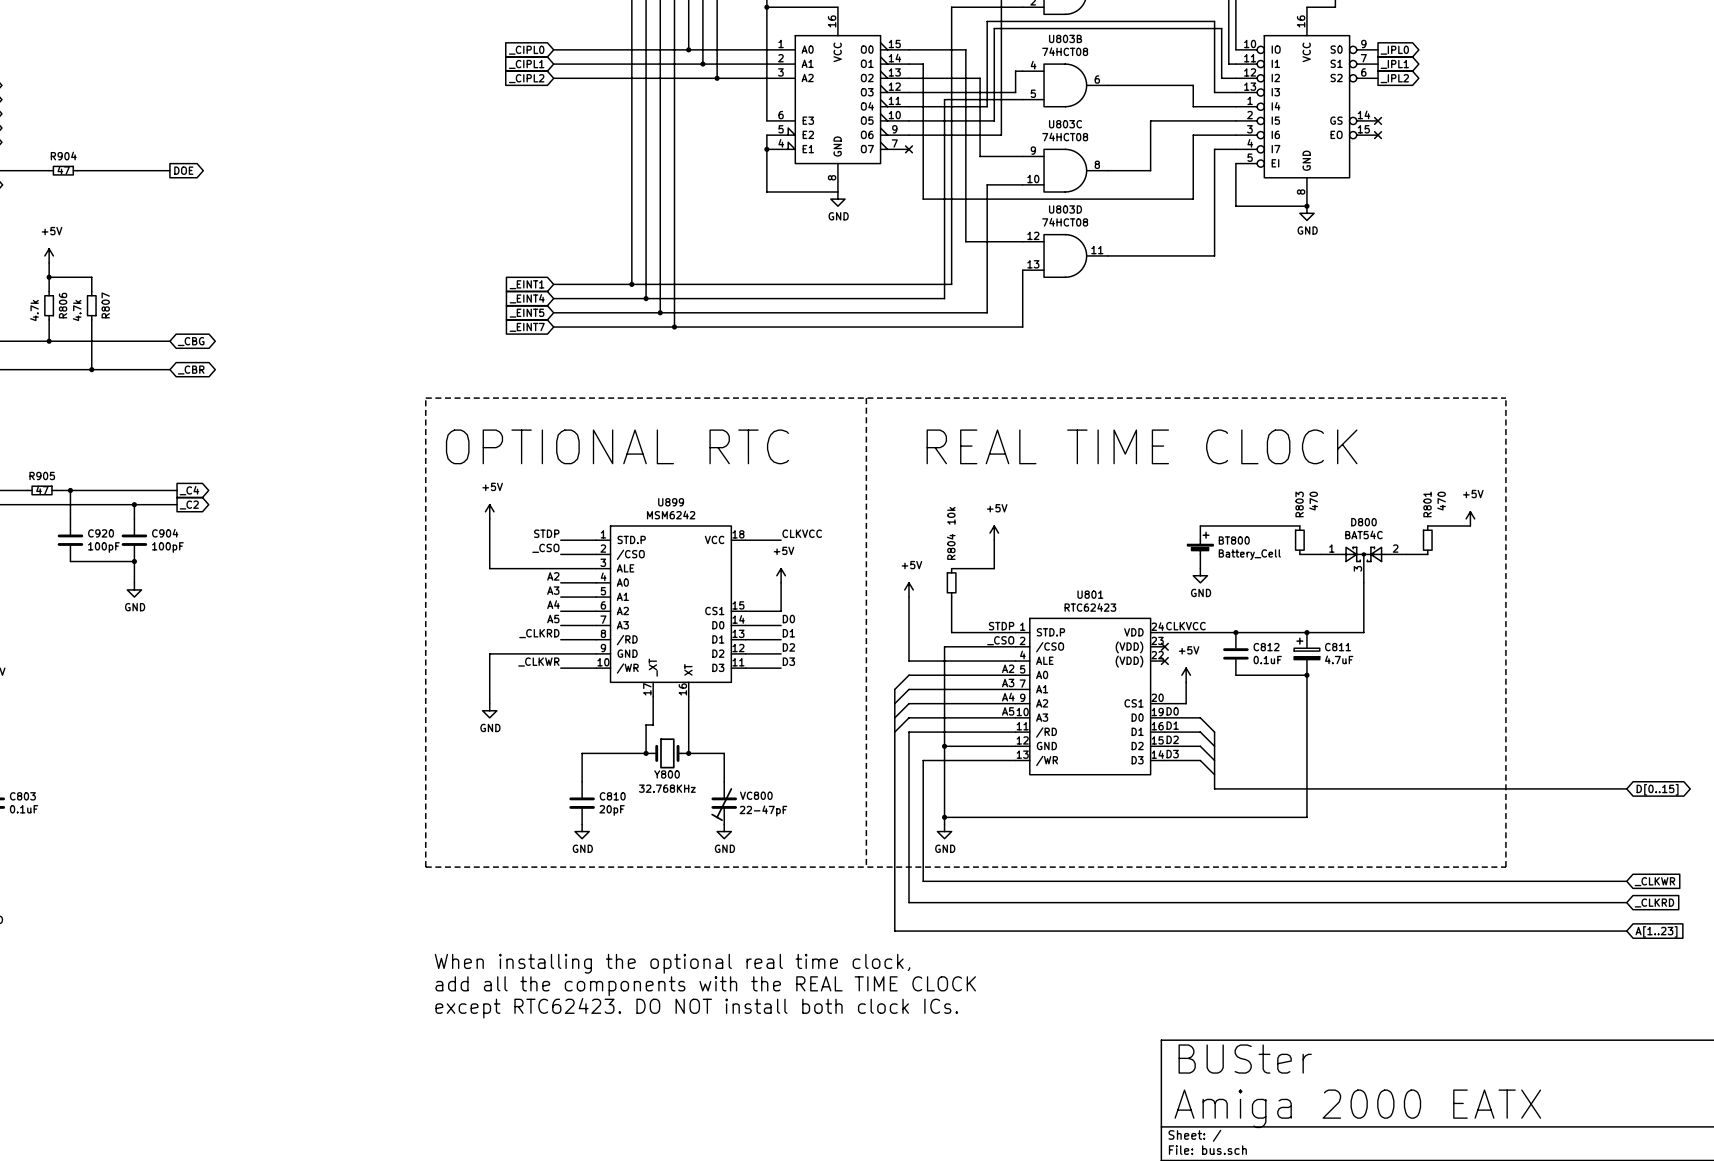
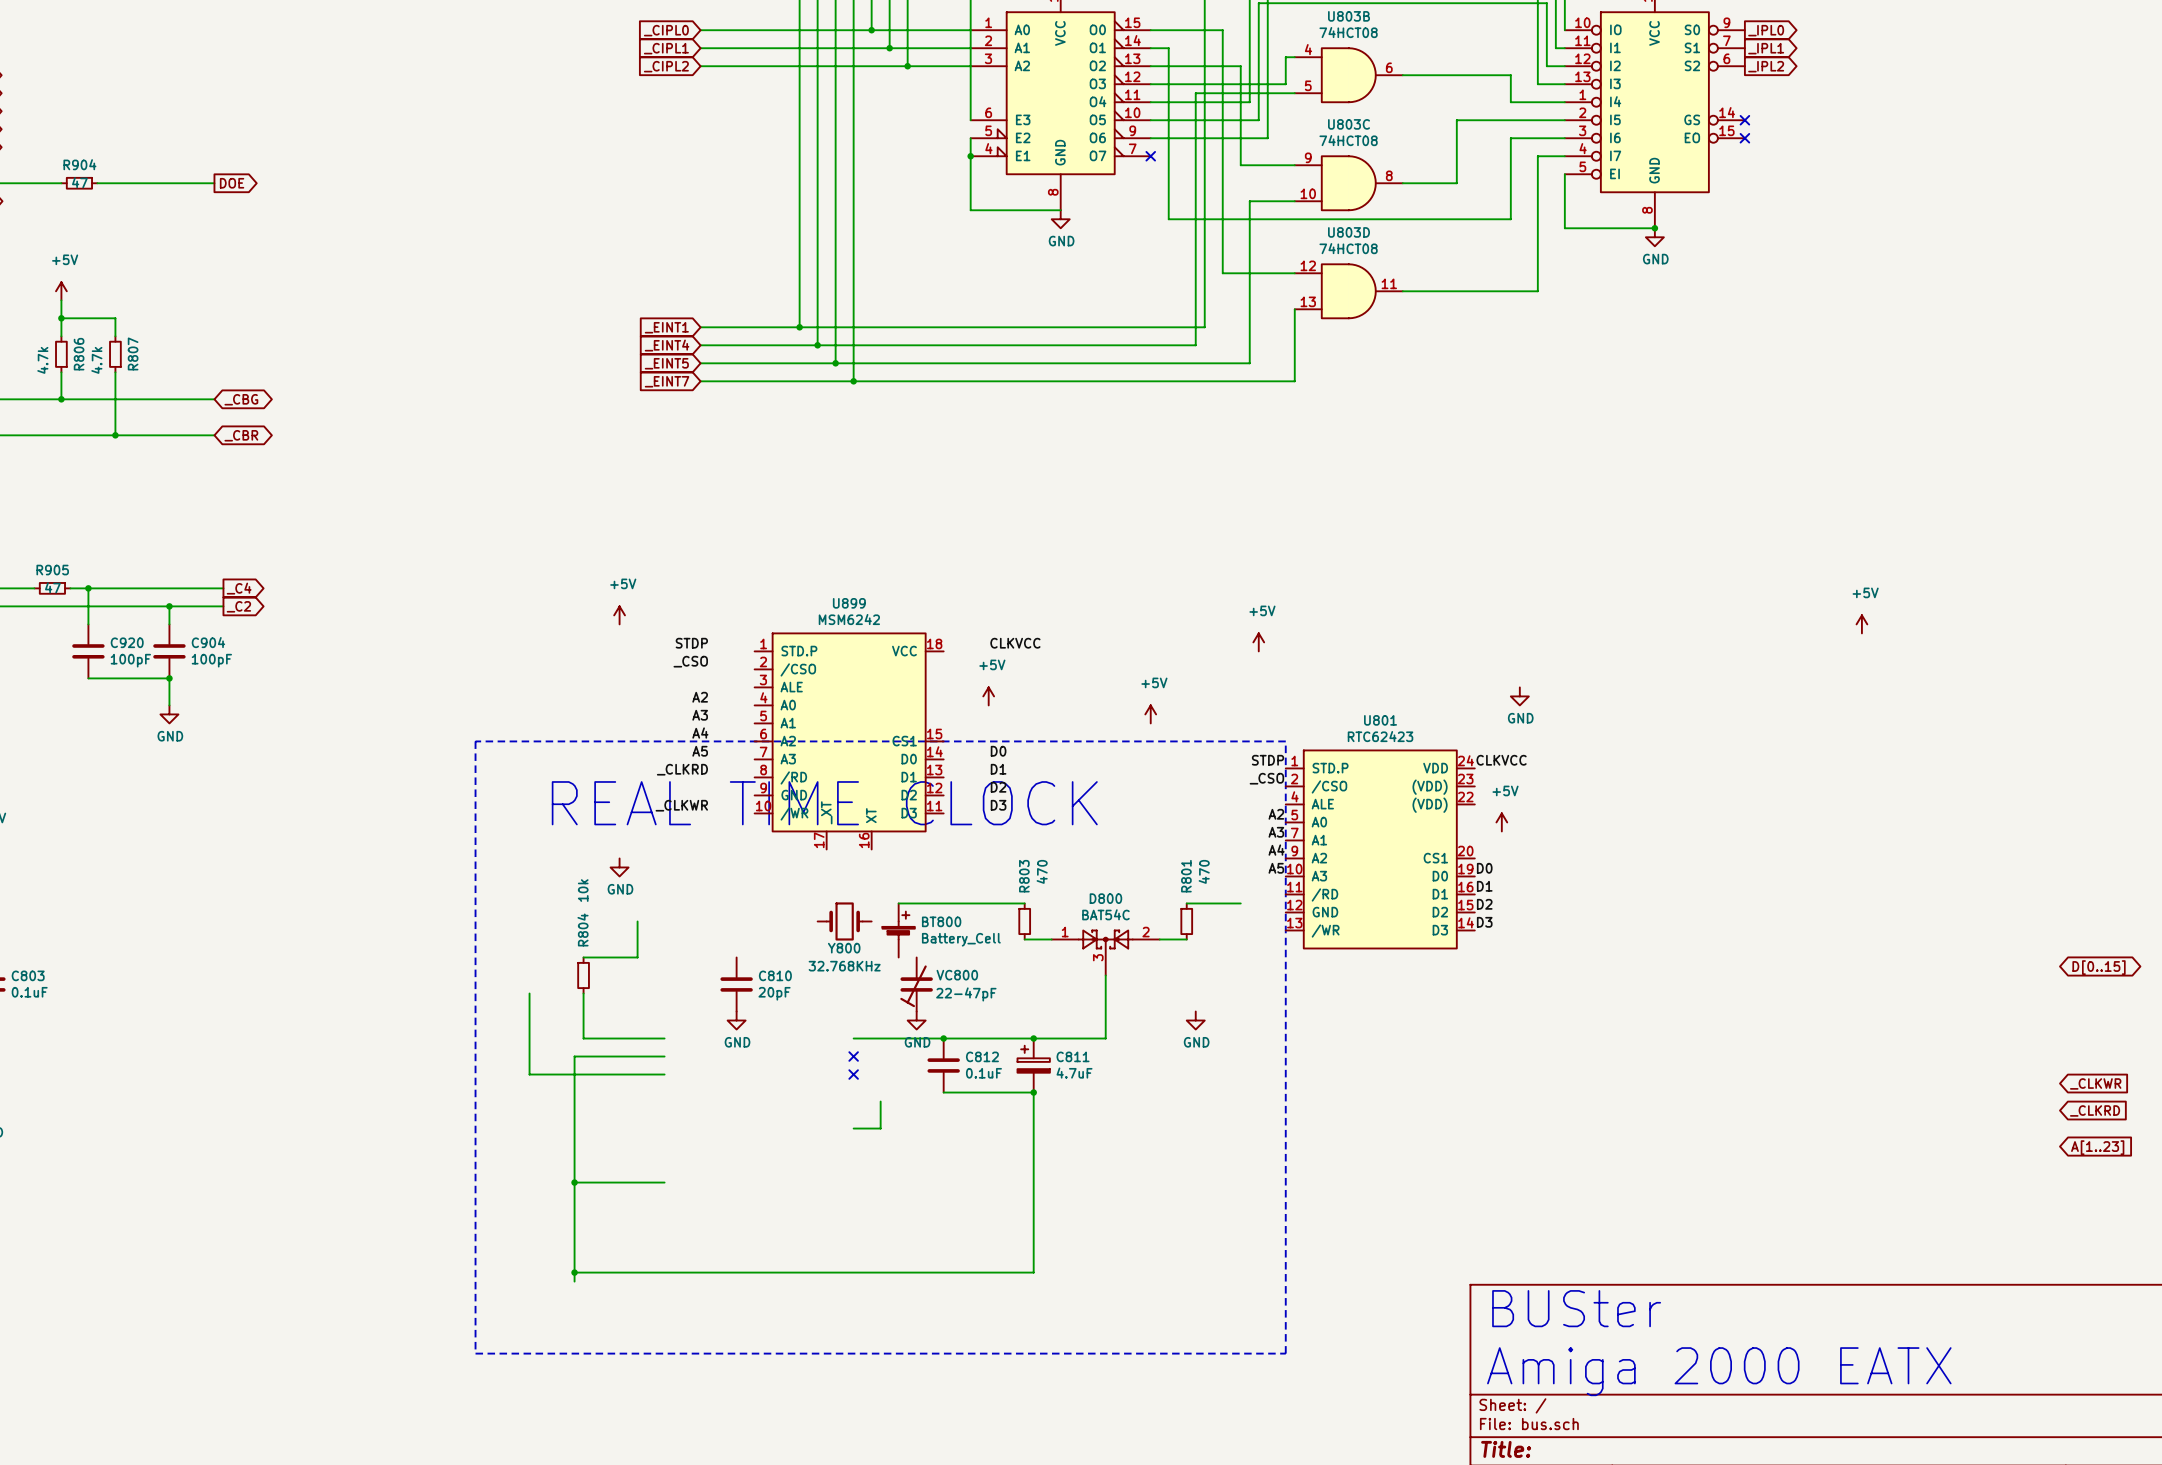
line: (425, 398) (425, 867) (1505, 867) (1505, 398) (425, 398) -> none
line: (866, 398) (866, 867) -> none
text: OPTIONAL RTC (617, 446) -> none
text: REAL TIME CLOCK (1142, 446) -> none
wire: (489, 518) (489, 568) (596, 568) -> none
wire: (1200, 525) (1299, 525) -> none
wire: (1427, 525) (1470, 525) -> none
wire: (560, 540) (596, 540) -> none
wire: (745, 540) (781, 540) -> none
wire: (994, 540) (994, 568) (951, 568) -> none
R803 position: (1299, 540) -> (1024, 921)
R801 position: (1427, 540) -> (1186, 921)
BT800 position: (1200, 547) -> (898, 930)
wire: (560, 554) (596, 554) -> none
wire: (1299, 554) (1321, 554) -> none
wire: (1406, 554) (1427, 554) -> none
D800 position: (1363, 565) -> (1105, 952)
wire: (560, 582) (596, 582) -> none
wire: (781, 582) (781, 611) (745, 611) -> none
R804 position: (951, 582) -> (583, 975)
wire: (1363, 582) (1363, 632) (1164, 632) -> none
wire: (560, 597) (596, 597) -> none
wire: (909, 597) (909, 661) (1015, 661) -> none
wire: (951, 597) (951, 632) (1015, 632) -> none
line: none -> (475, 741) (1285, 741) (1285, 1353) (475, 1353) (475, 741)
wire: (560, 625) (596, 625) -> none
wire: (745, 625) (781, 625) -> none
junction: (1235, 632) -> none
junction: (1306, 632) -> none
wire: (560, 639) (596, 639) -> none
wire: (745, 639) (781, 639) -> none
wire: (1015, 646) (944, 646) (944, 824) -> none
no-connect mark: (1164, 646) -> none
wire: (596, 653) (489, 653) (489, 703) -> none
wire: (745, 653) (781, 653) -> none
C812 position: (1235, 653) -> (943, 1065)
C811 position: (1306, 653) -> (1033, 1065)
text: none -> REAL TIME CLOCK (824, 803)
no-connect mark: (1164, 661) -> none
wire: (560, 668) (596, 668) -> none
wire: (745, 668) (781, 668) -> none
wire: (1015, 675) (909, 675) (894, 689) -> none
wire: (1235, 675) (1306, 675) (1306, 817) (944, 817) -> none
junction: (1306, 675) -> none
wire: (1186, 682) (1186, 703) (1164, 703) -> none
bus: (894, 689) (894, 931) (1626, 931) -> none
wire: (1015, 689) (909, 689) (894, 703) -> none
wire: (653, 696) (653, 724) (646, 724) (646, 753) (582, 753) (582, 781) -> none
wire: (688, 696) (688, 753) (724, 753) (724, 781) -> none
wire: (1015, 703) (909, 703) (894, 717) -> none
wire: (1015, 717) (909, 717) (894, 732) -> none
wire: (1164, 717) (1200, 717) (1214, 732) -> none
wire: (1015, 732) (909, 732) (909, 902) (1626, 902) -> none
wire: (1164, 732) (1200, 732) (1214, 746) -> none
bus: (1214, 732) (1214, 788) (1626, 788) -> none
wire: none -> (898, 903) (1024, 903)
wire: none -> (1186, 903) (1240, 903)
wire: (944, 746) (1015, 746) -> none
junction: (944, 746) -> none
wire: (1164, 746) (1200, 746) (1214, 760) -> none
wire: none -> (637, 921) (637, 957) (583, 957)
junction: (646, 753) -> none
junction: (688, 753) -> none
wire: (1015, 760) (923, 760) (923, 881) (1626, 881) -> none
wire: (1164, 760) (1200, 760) (1214, 774) -> none
wire: none -> (1024, 939) (1051, 939)
wire: none -> (1159, 939) (1186, 939)
wire: none -> (1105, 975) (1105, 1038) (853, 1038)
wire: none -> (529, 993) (529, 1074) (664, 1074)
wire: none -> (583, 993) (583, 1038) (664, 1038)
junction: (944, 817) -> none
junction: none -> (943, 1038)
junction: none -> (1033, 1038)
wire: none -> (664, 1056) (574, 1056) (574, 1281)
no-connect mark: none -> (853, 1056)
no-connect mark: none -> (853, 1074)
wire: none -> (943, 1092) (1033, 1092) (1033, 1272) (574, 1272)
junction: none -> (1033, 1092)
wire: none -> (880, 1101) (880, 1128) (853, 1128)
wire: none -> (574, 1182) (664, 1182)
junction: none -> (574, 1182)
text: When installing the optional real time clock, (672, 963) -> none
text: add all the components with the REAL TIME CLOCK (705, 986) -> none
text: except RTC62423. DO NOT install both clock ICs. (696, 1008) -> none
junction: none -> (574, 1272)

